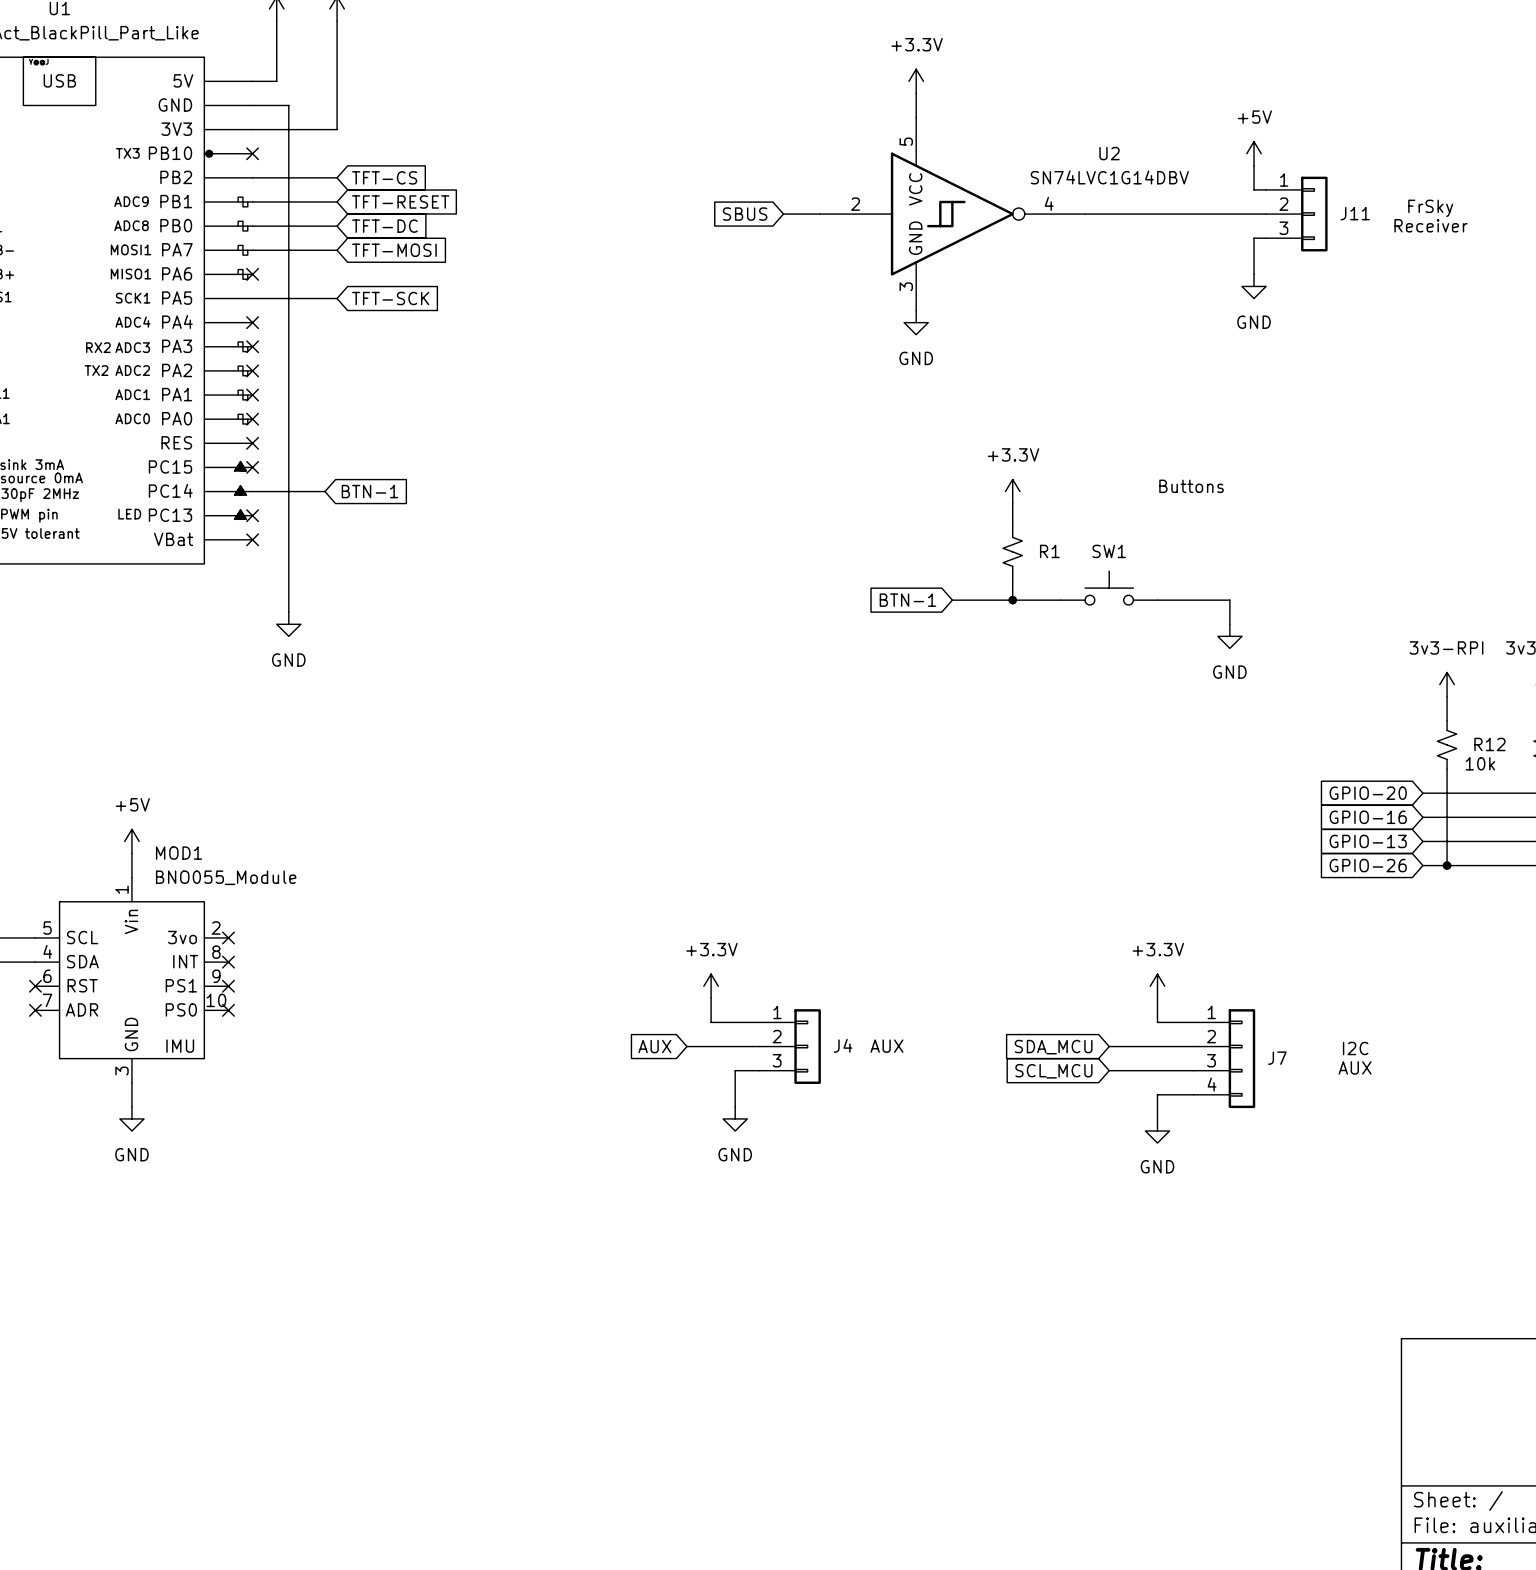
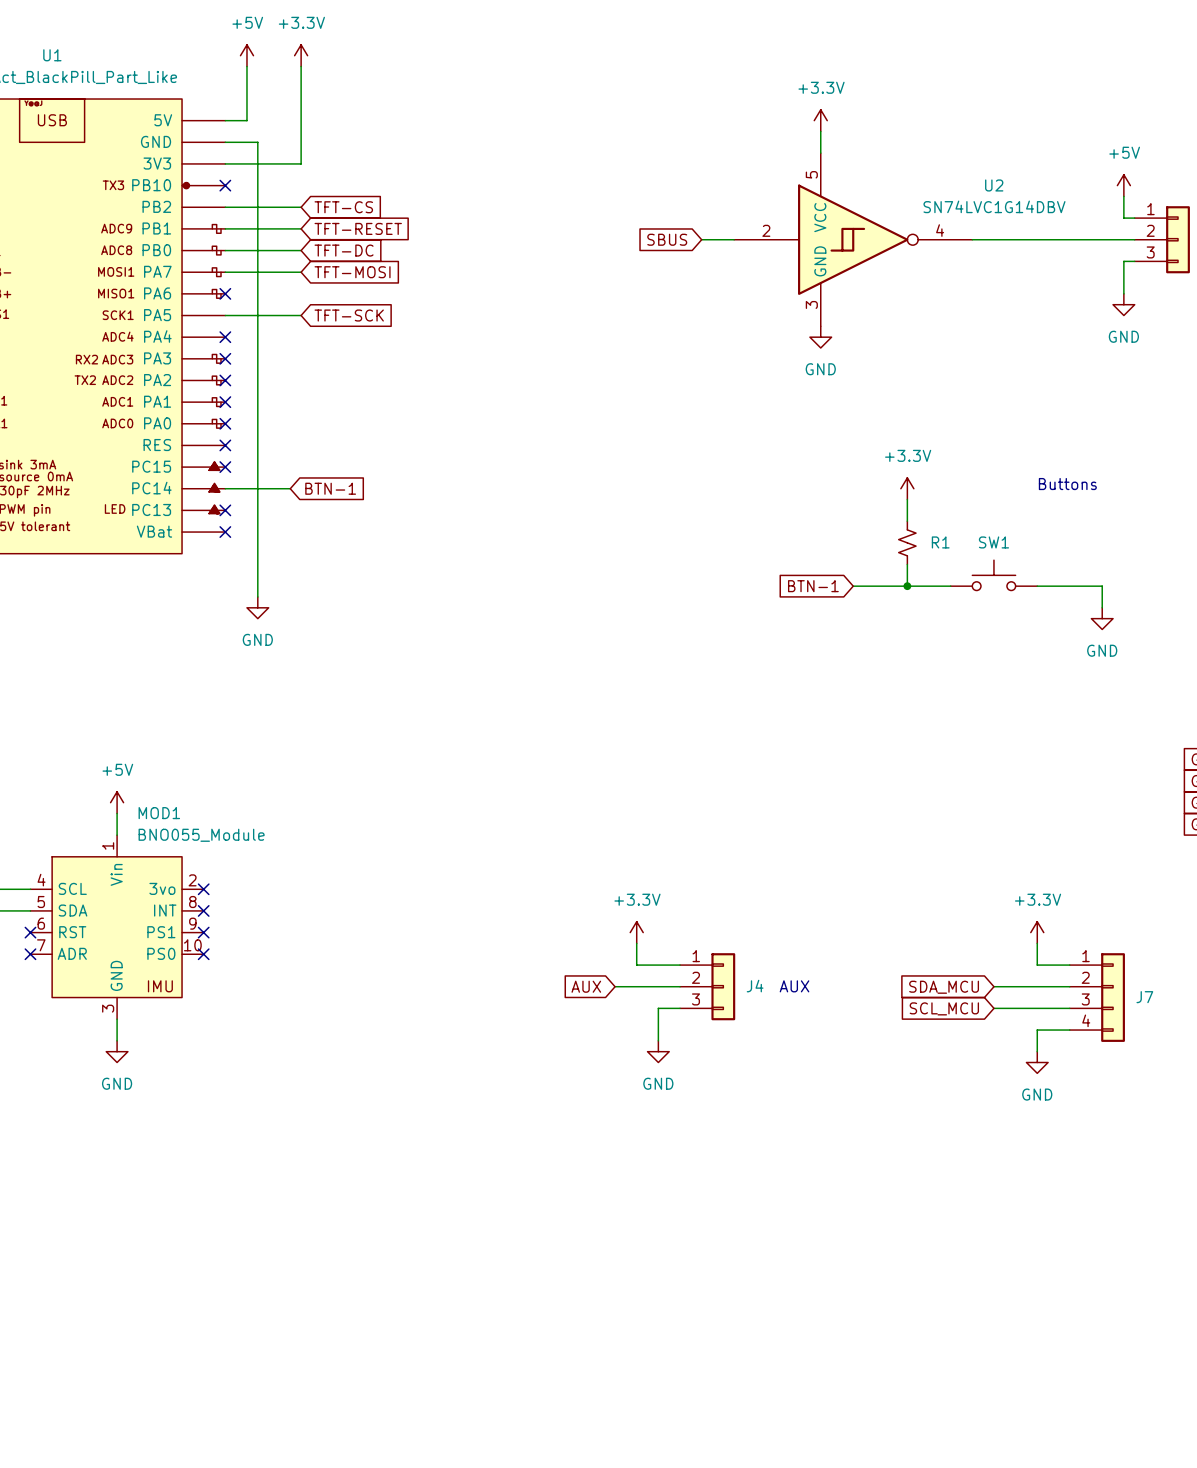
MOD1 pin number: 5 (47, 928) -> 4 (41, 880)
MOD1 pin number: 4 (47, 951) -> 5 (41, 902)

